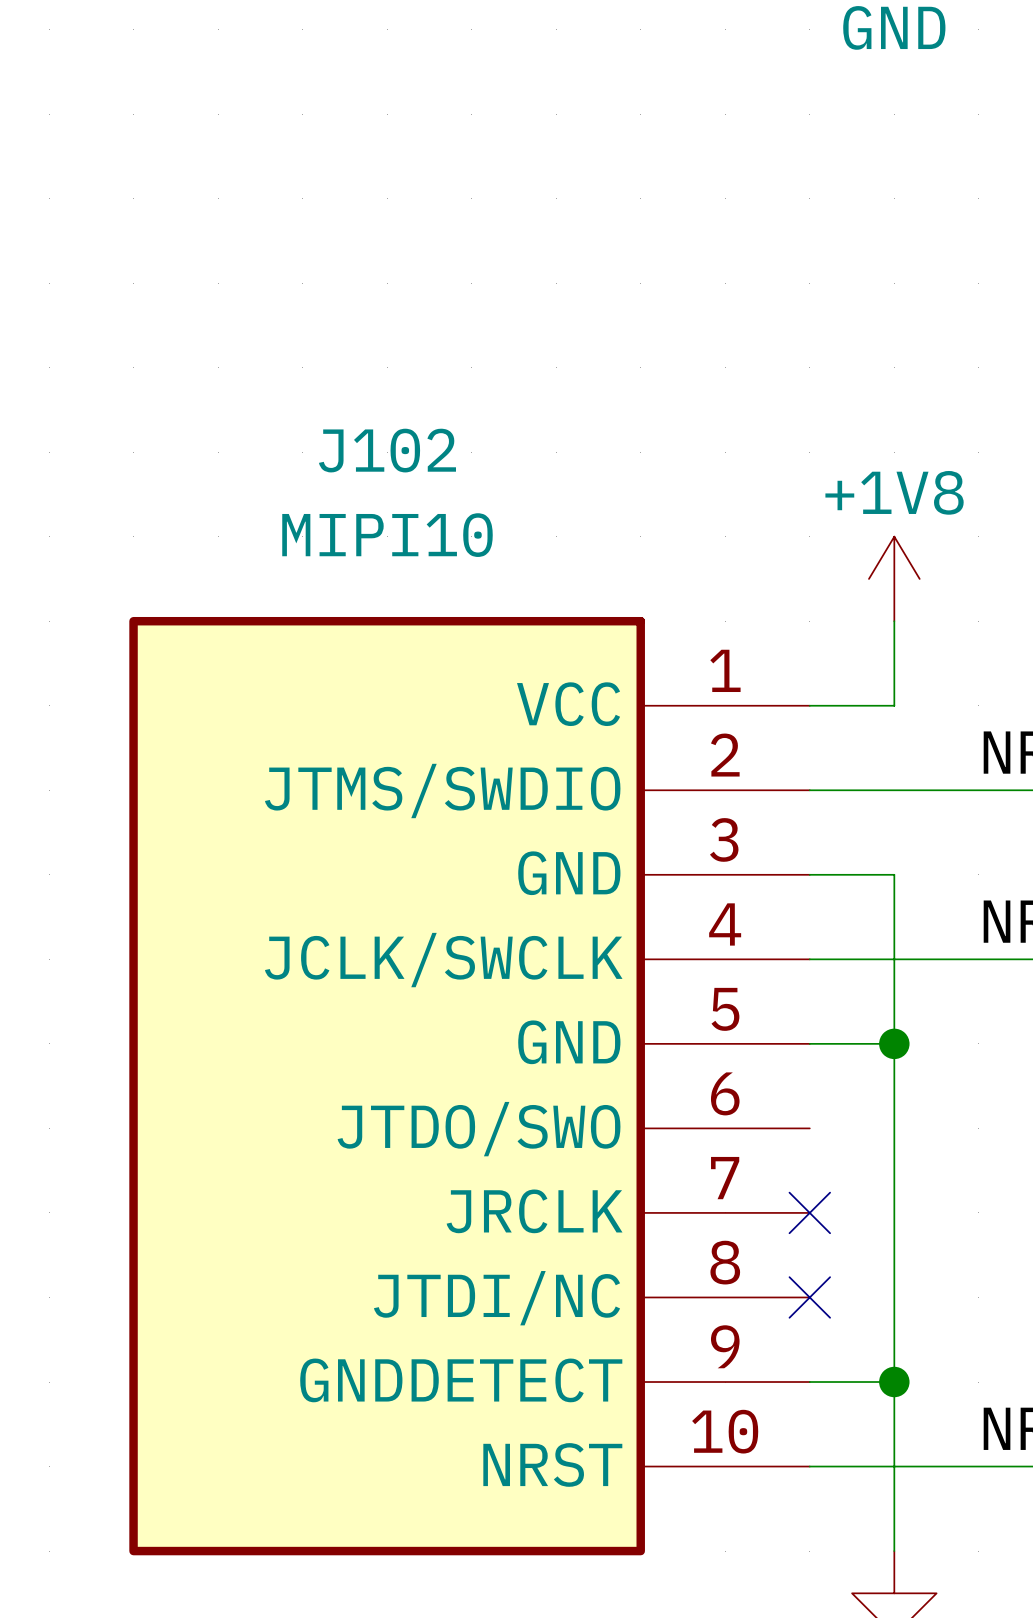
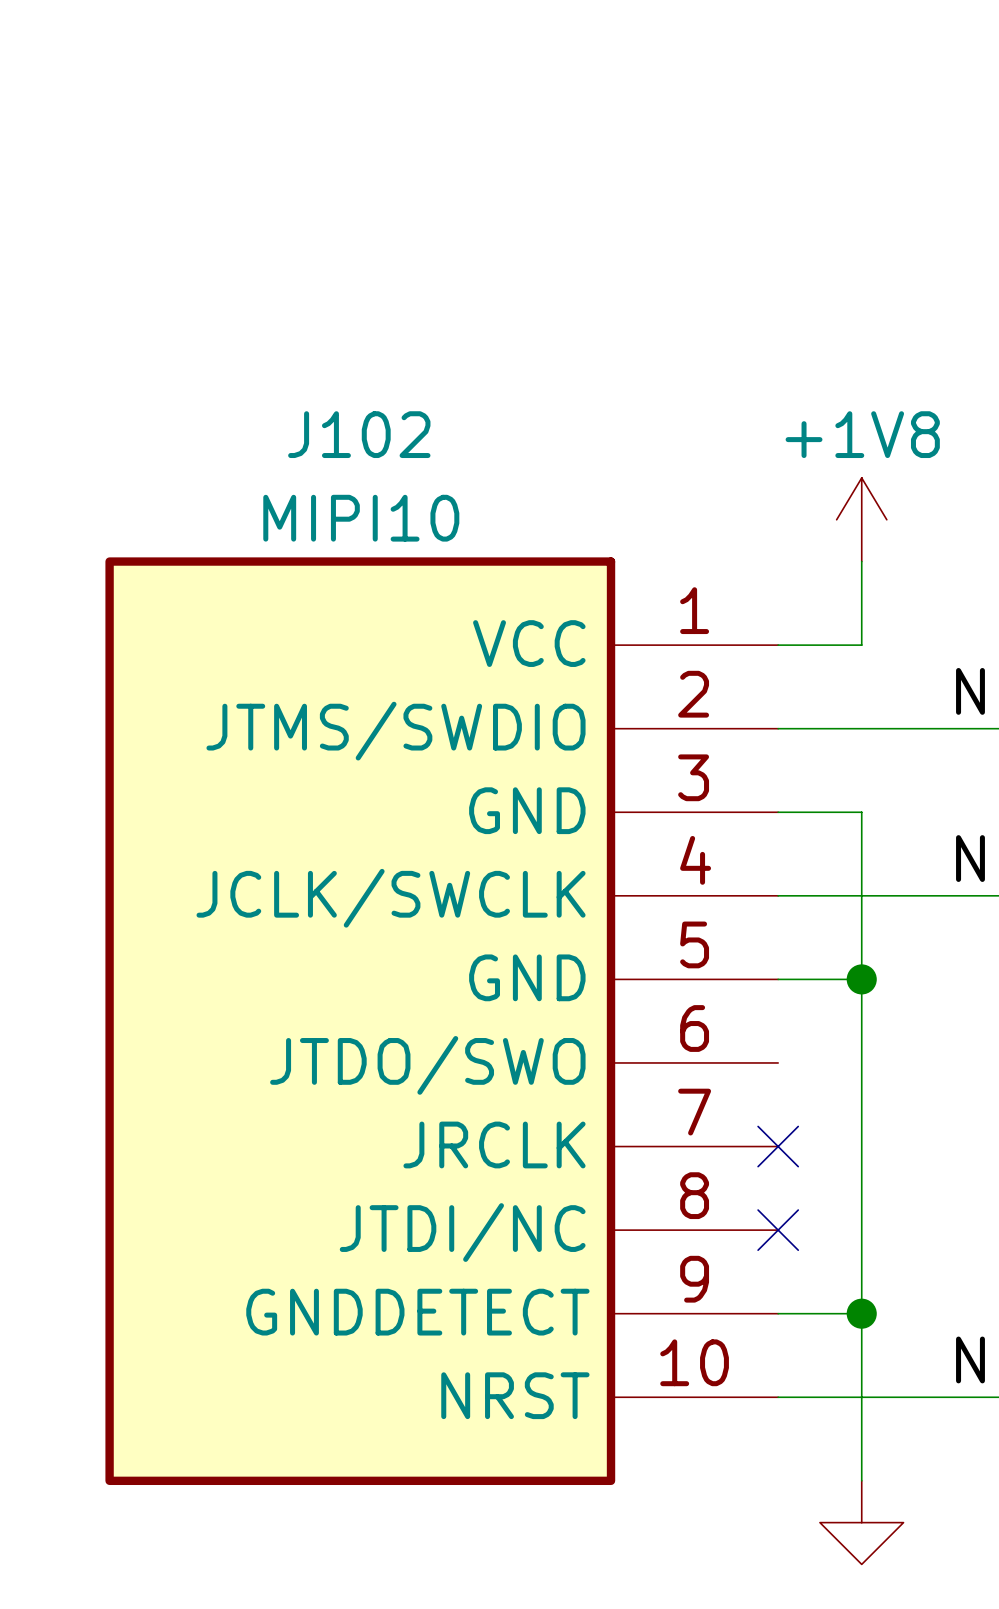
J102 name position: J102 (387, 450) -> J102 (359, 434)
J102 value position: MIPI10 (387, 535) -> MIPI10 (361, 518)

